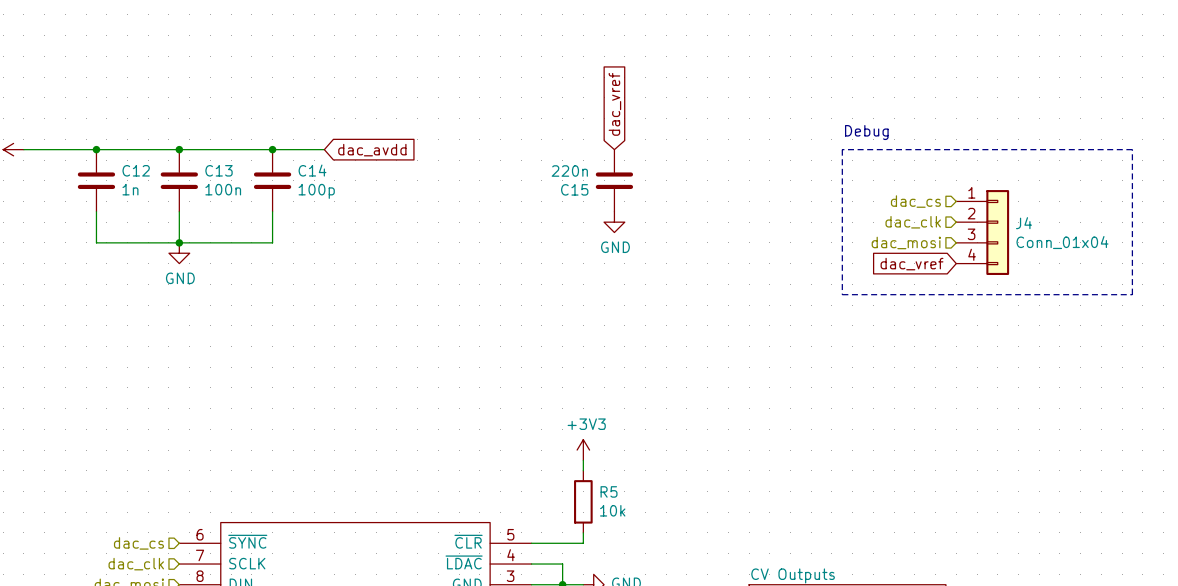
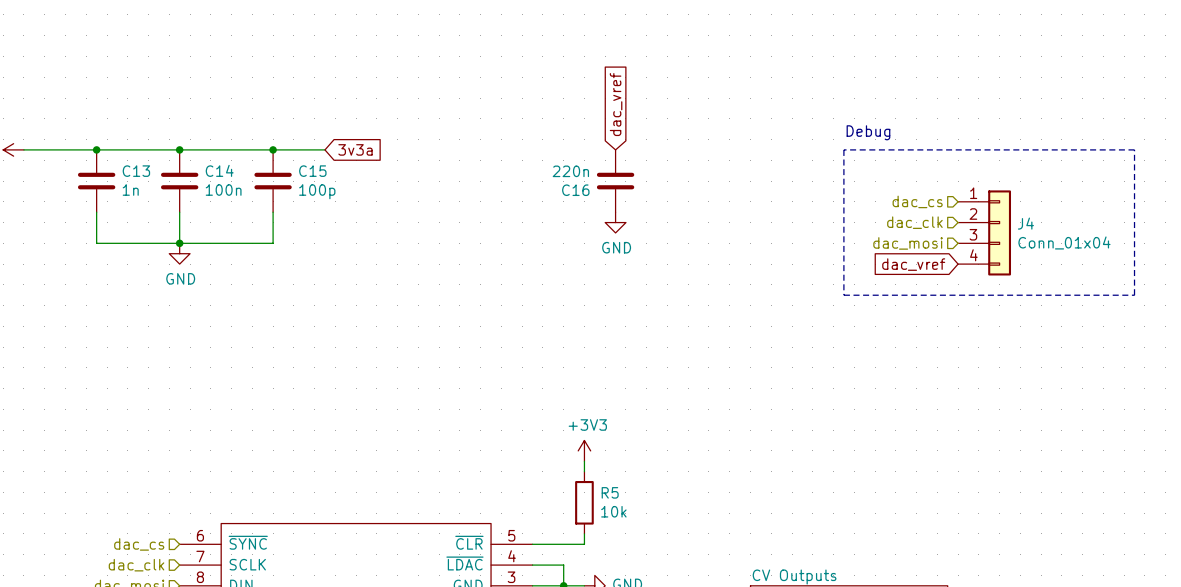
global label: dac_avdd (372, 150) -> 3v3a (355, 149)
C12 name: C12 (136, 170) -> C13 (136, 171)
C13 name: C13 (219, 170) -> C14 (219, 170)
C14 name: C14 (312, 170) -> C15 (312, 171)
C15 name: C15 (574, 189) -> C16 (575, 190)

